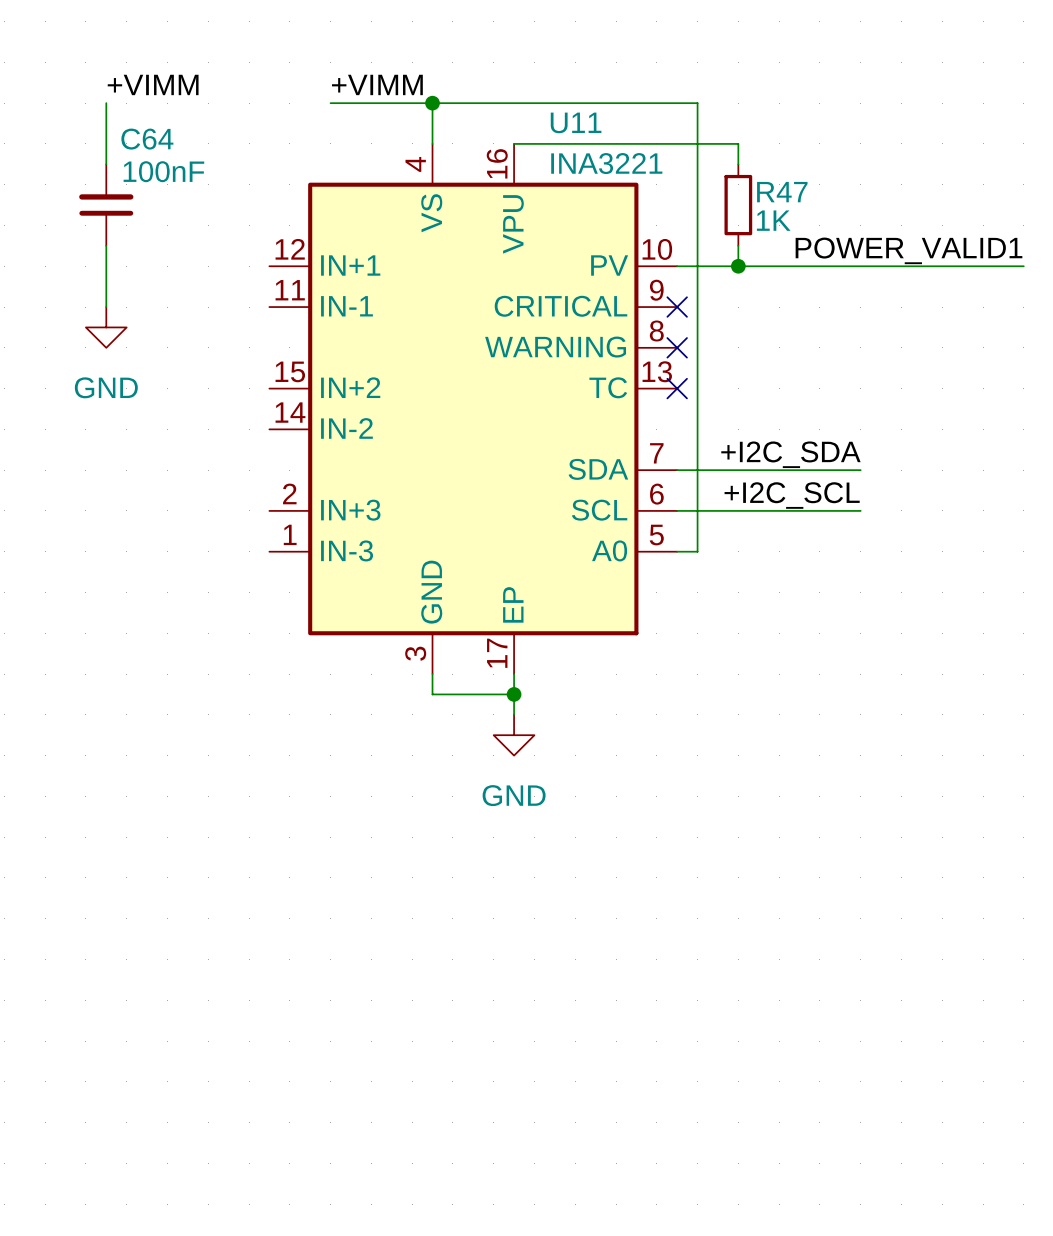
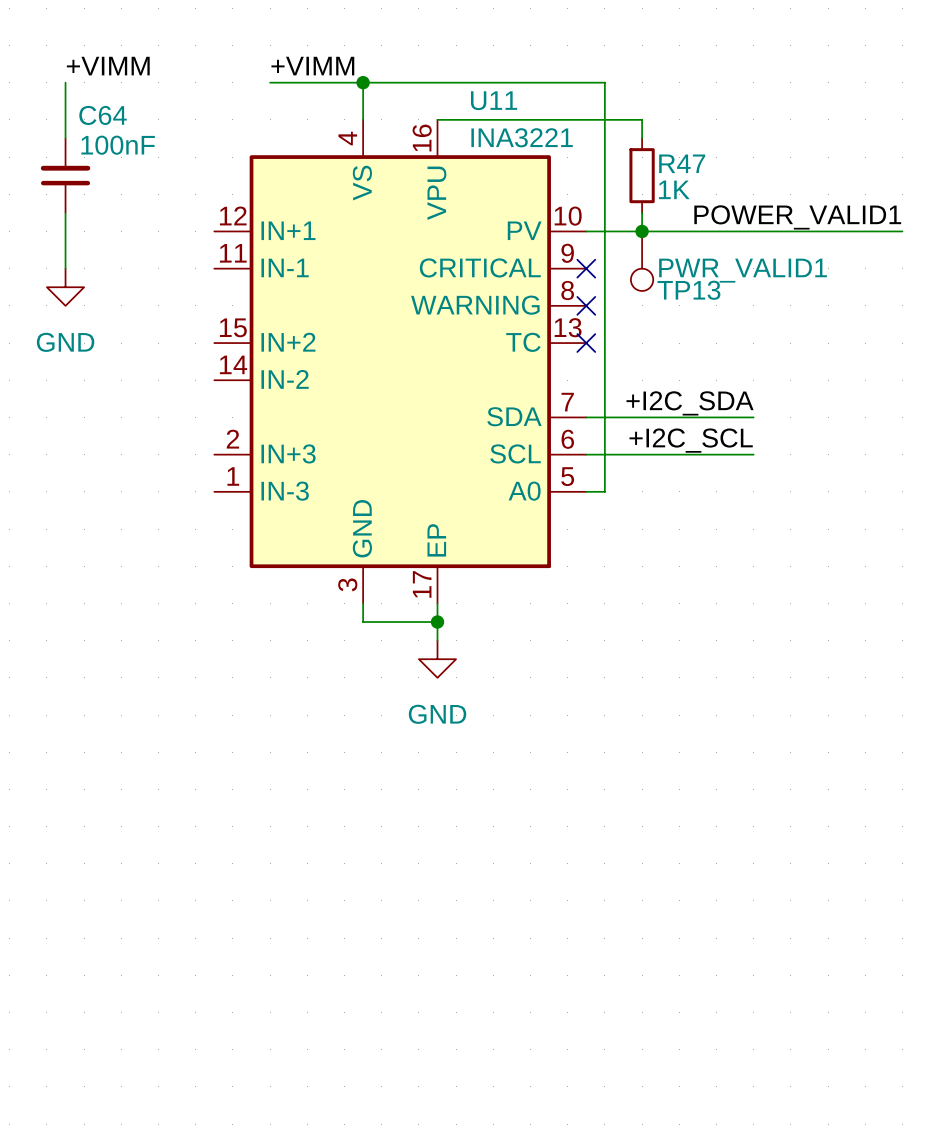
TP13: none -> PWR_VALID1 (642, 261)

